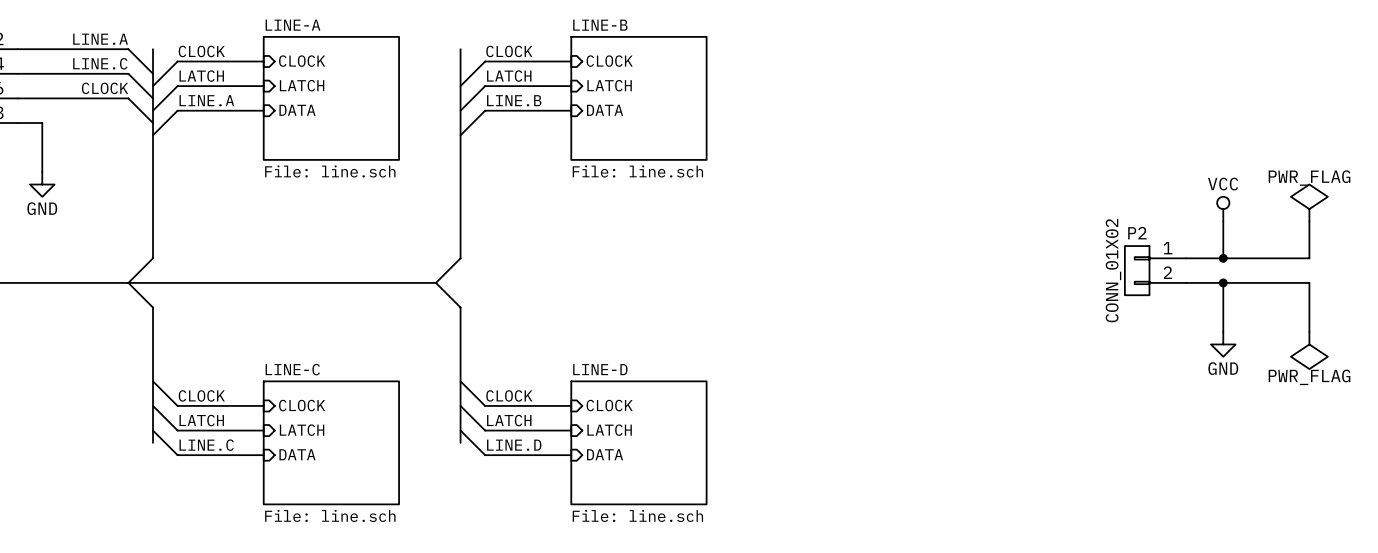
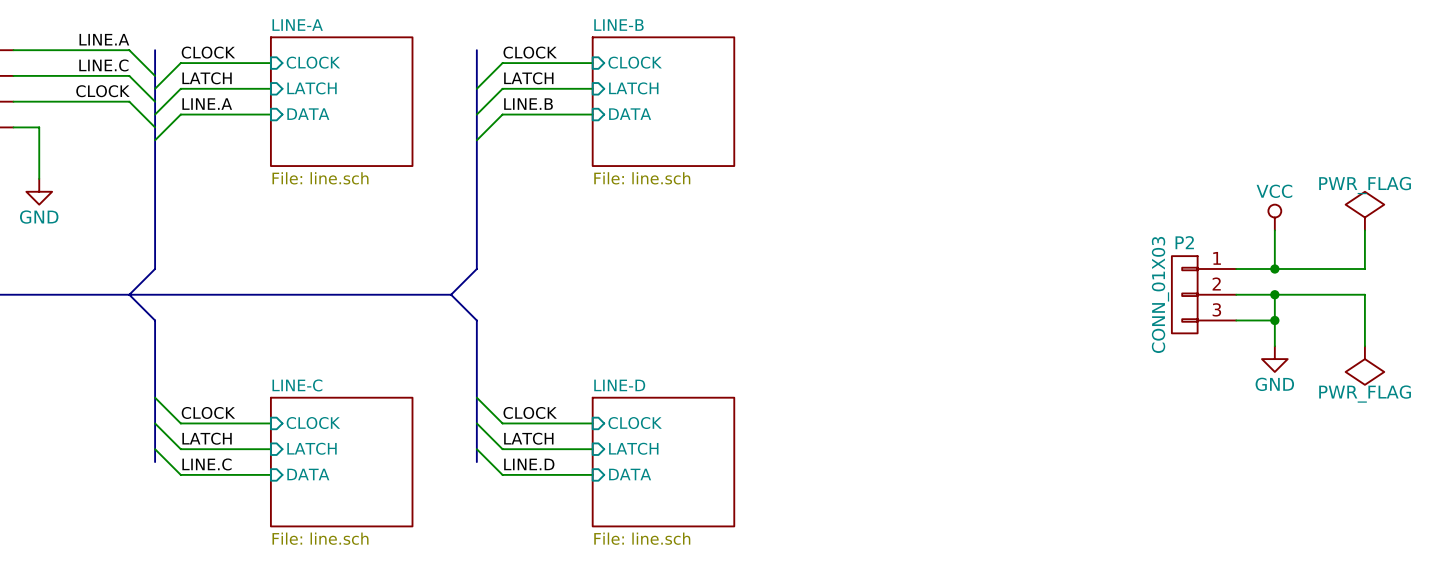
P2 symbol: [1124, 246, 1187, 296] -> [1171, 256, 1237, 334]
P2 value: CONN_01X02 (1113, 270) -> CONN_01X03 (1160, 294)
wire: none -> (1236, 320) (1274, 320)
junction: none -> (1274, 320)

